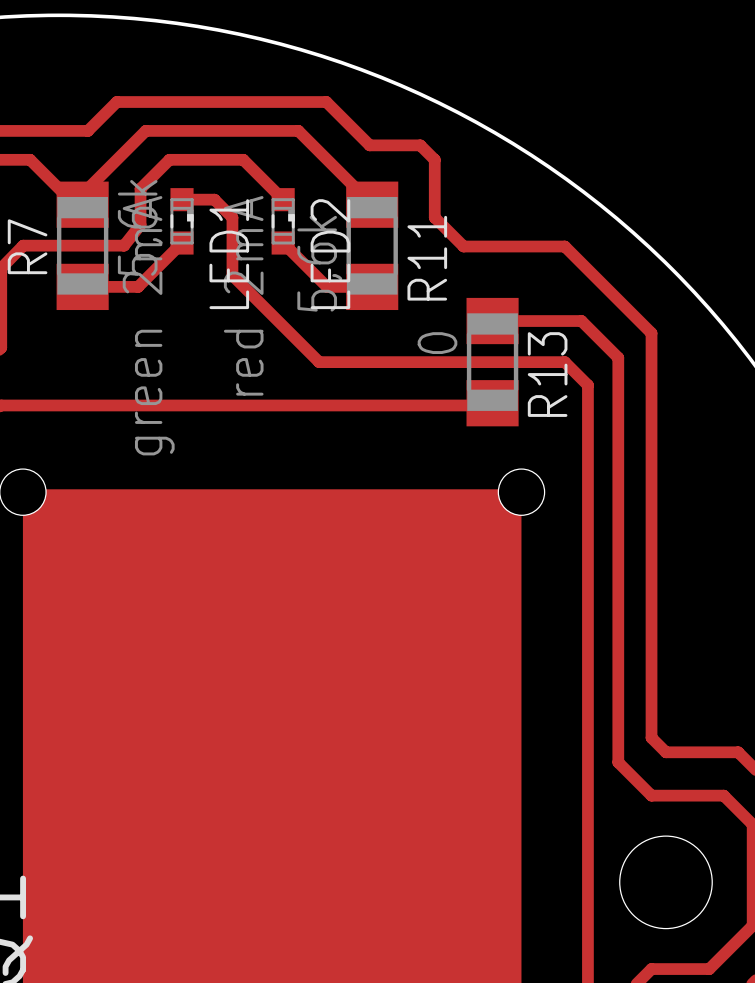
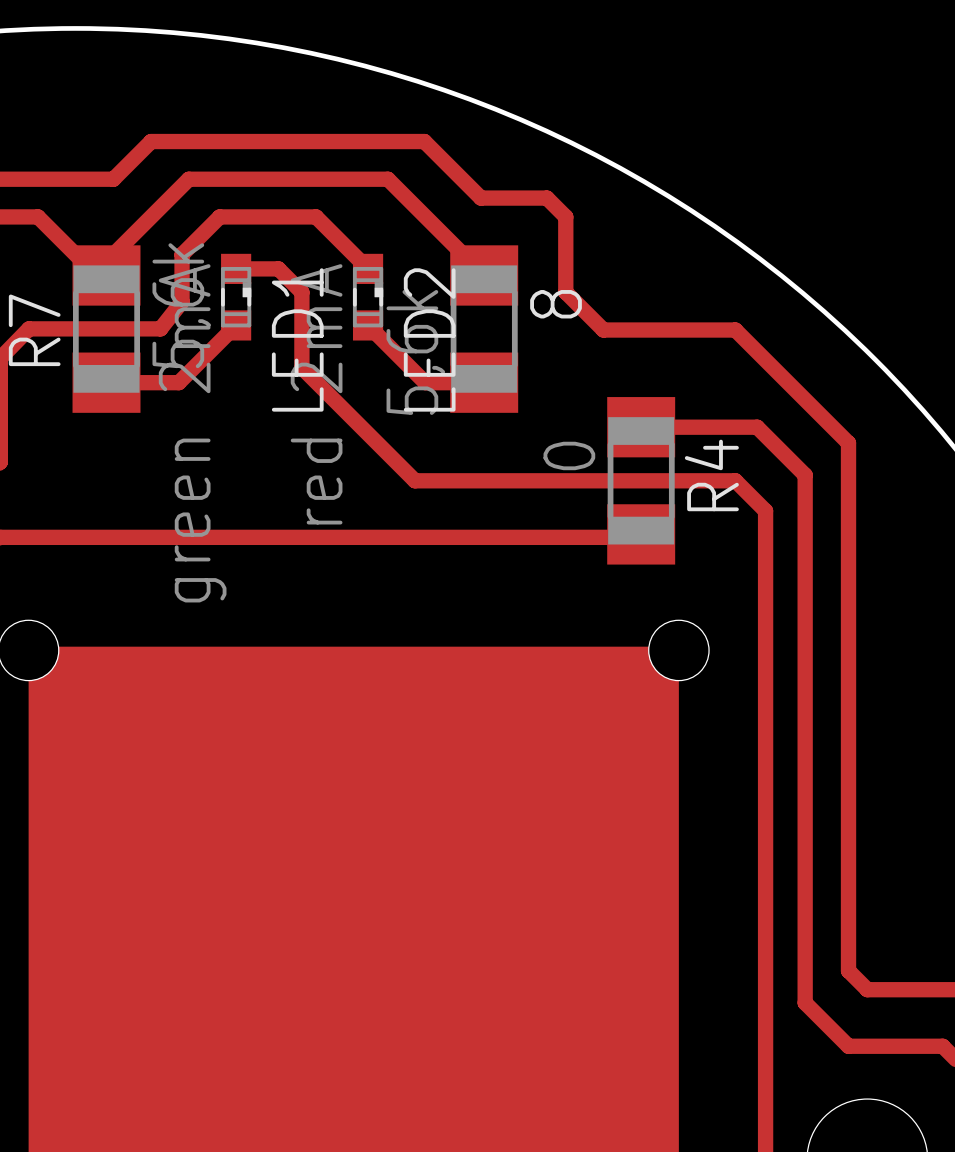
R11 name: R11 (427, 258) -> 8 (556, 304)
R13 name: R13 (547, 374) -> R4 (711, 475)

